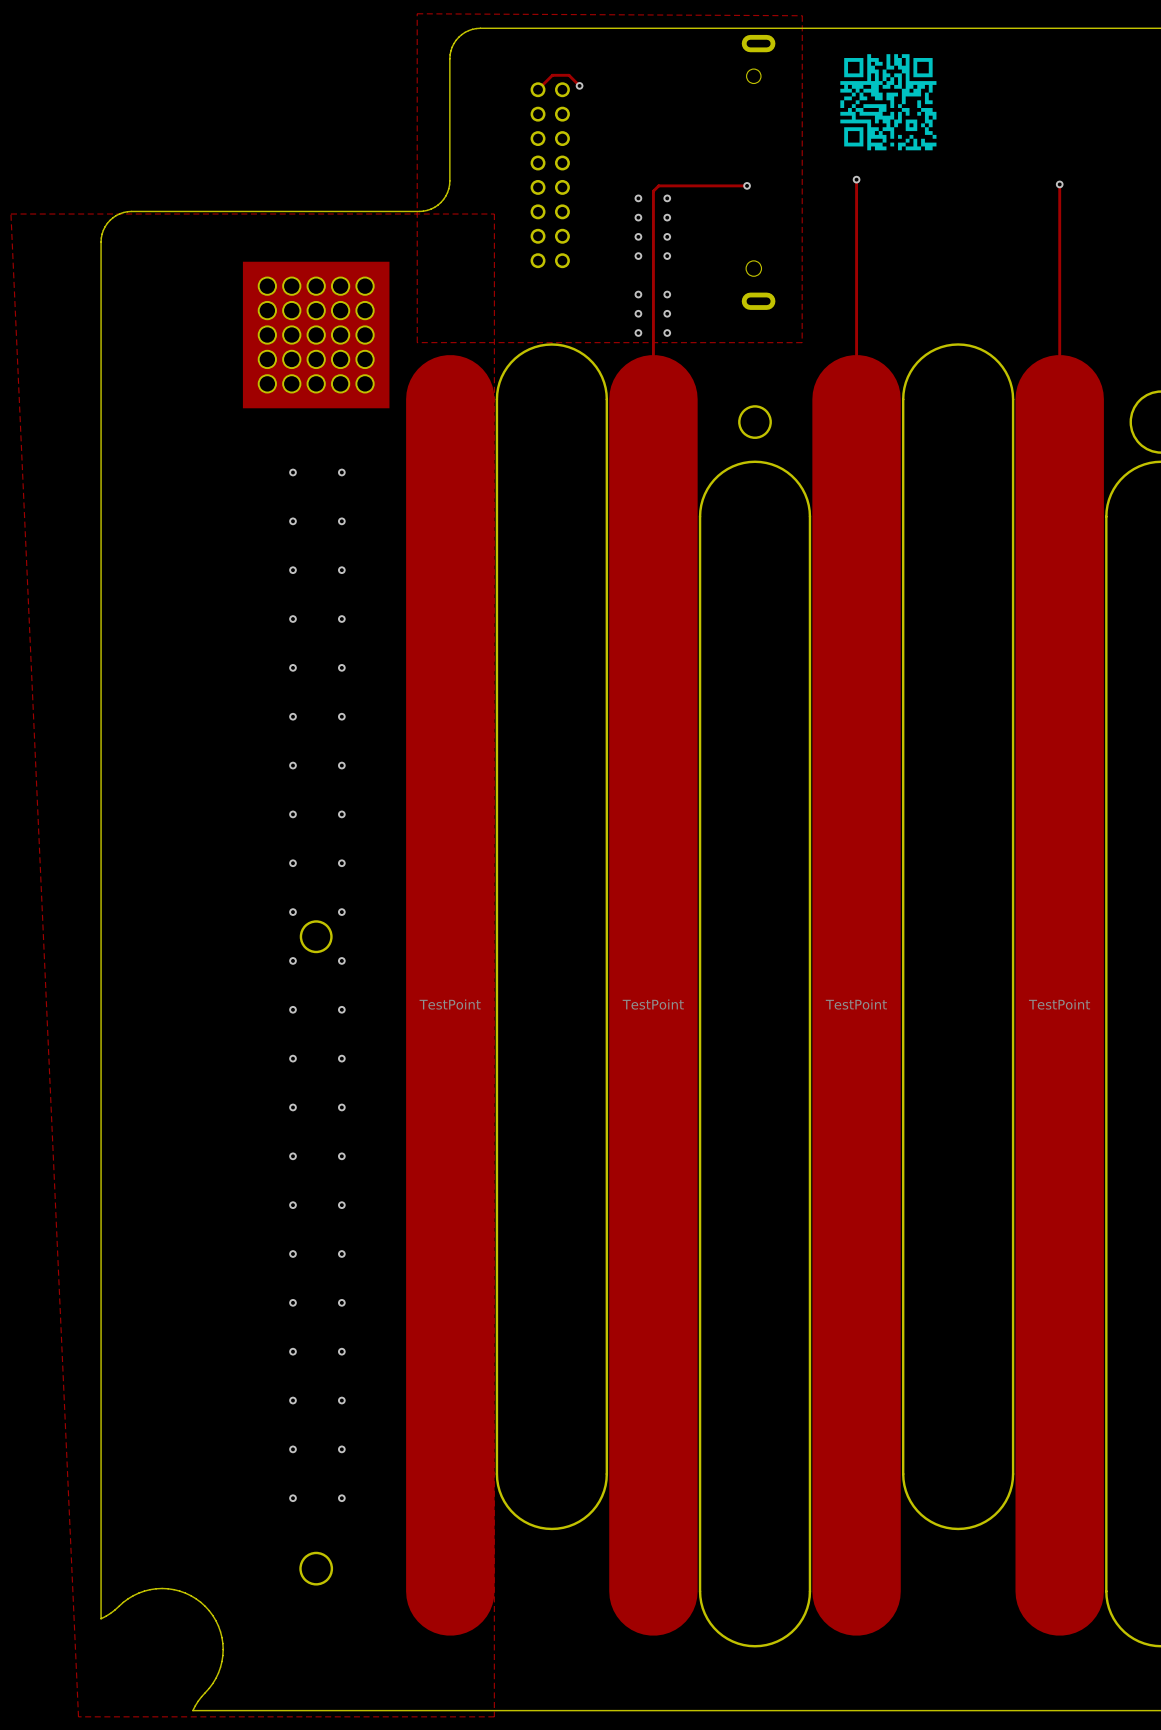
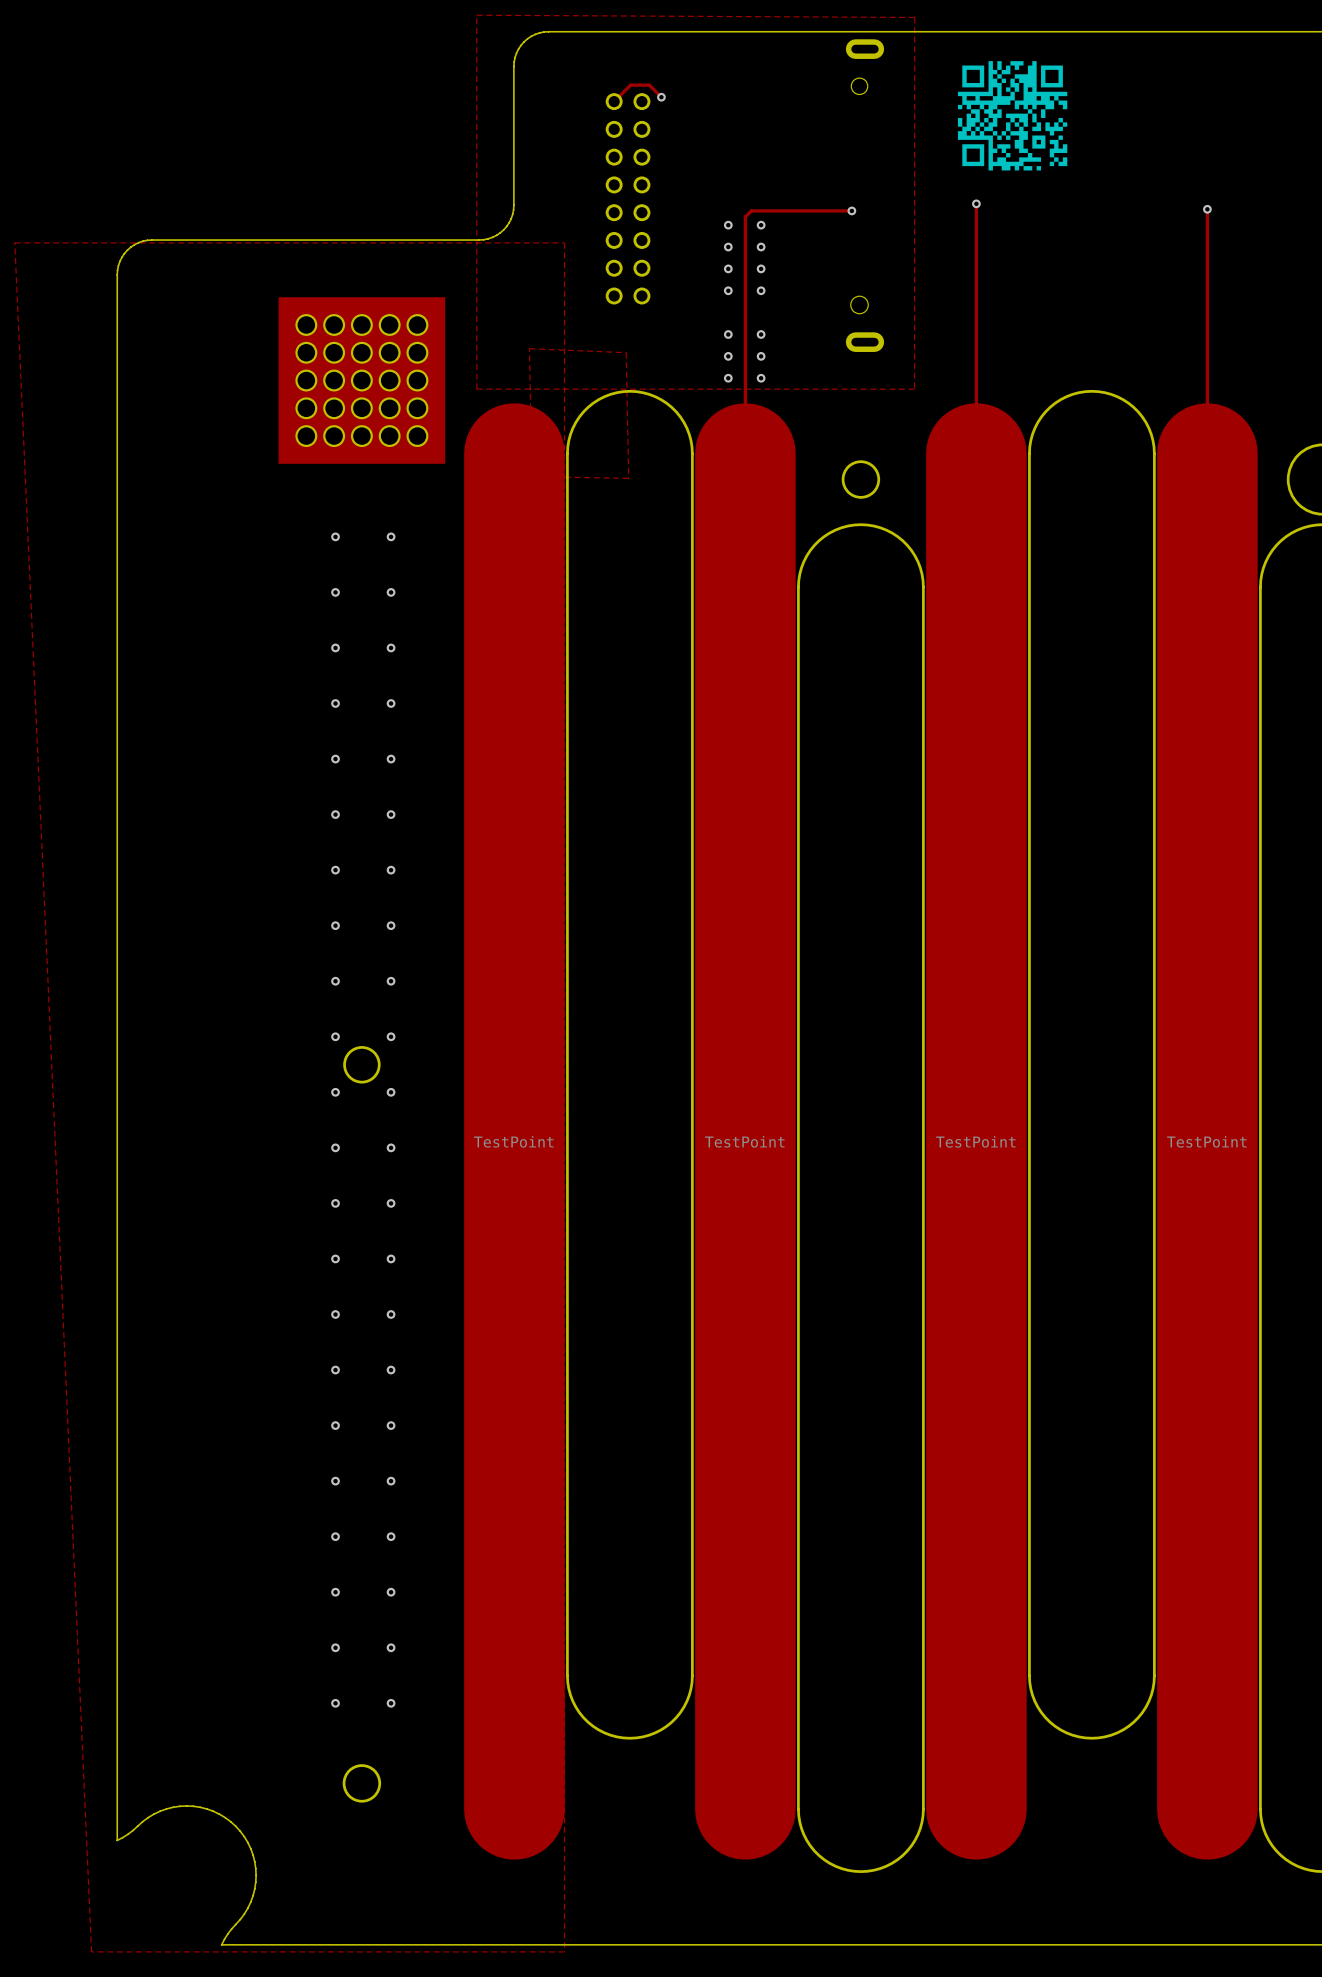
drawing shape: [840, 54, 937, 151] -> [957, 61, 1068, 171]
zone outline: none -> (529, 348) (532, 476) (628, 478) (626, 352) (529, 348)

